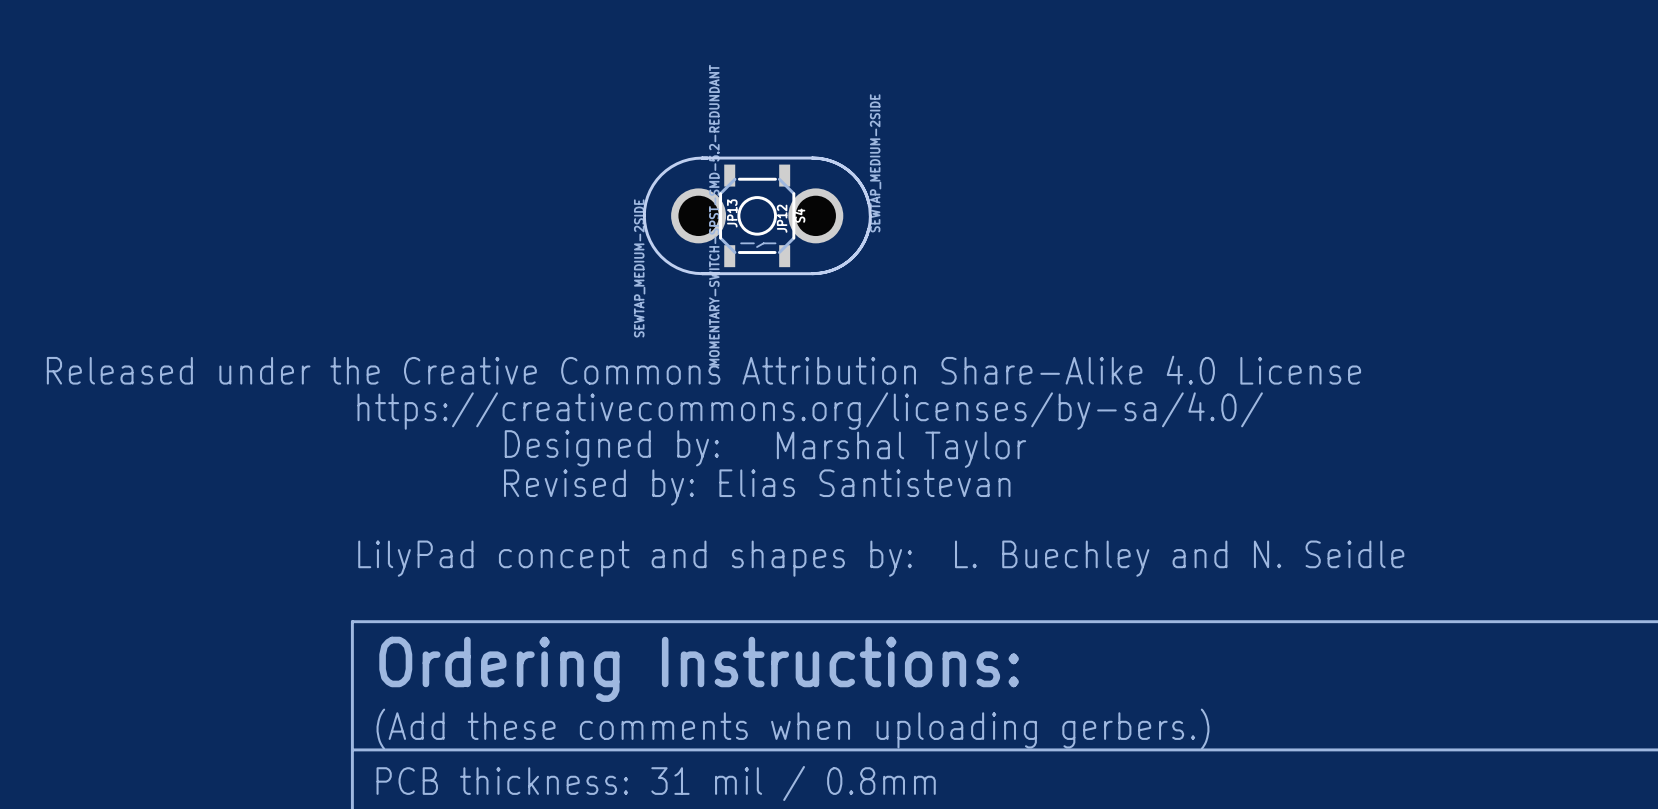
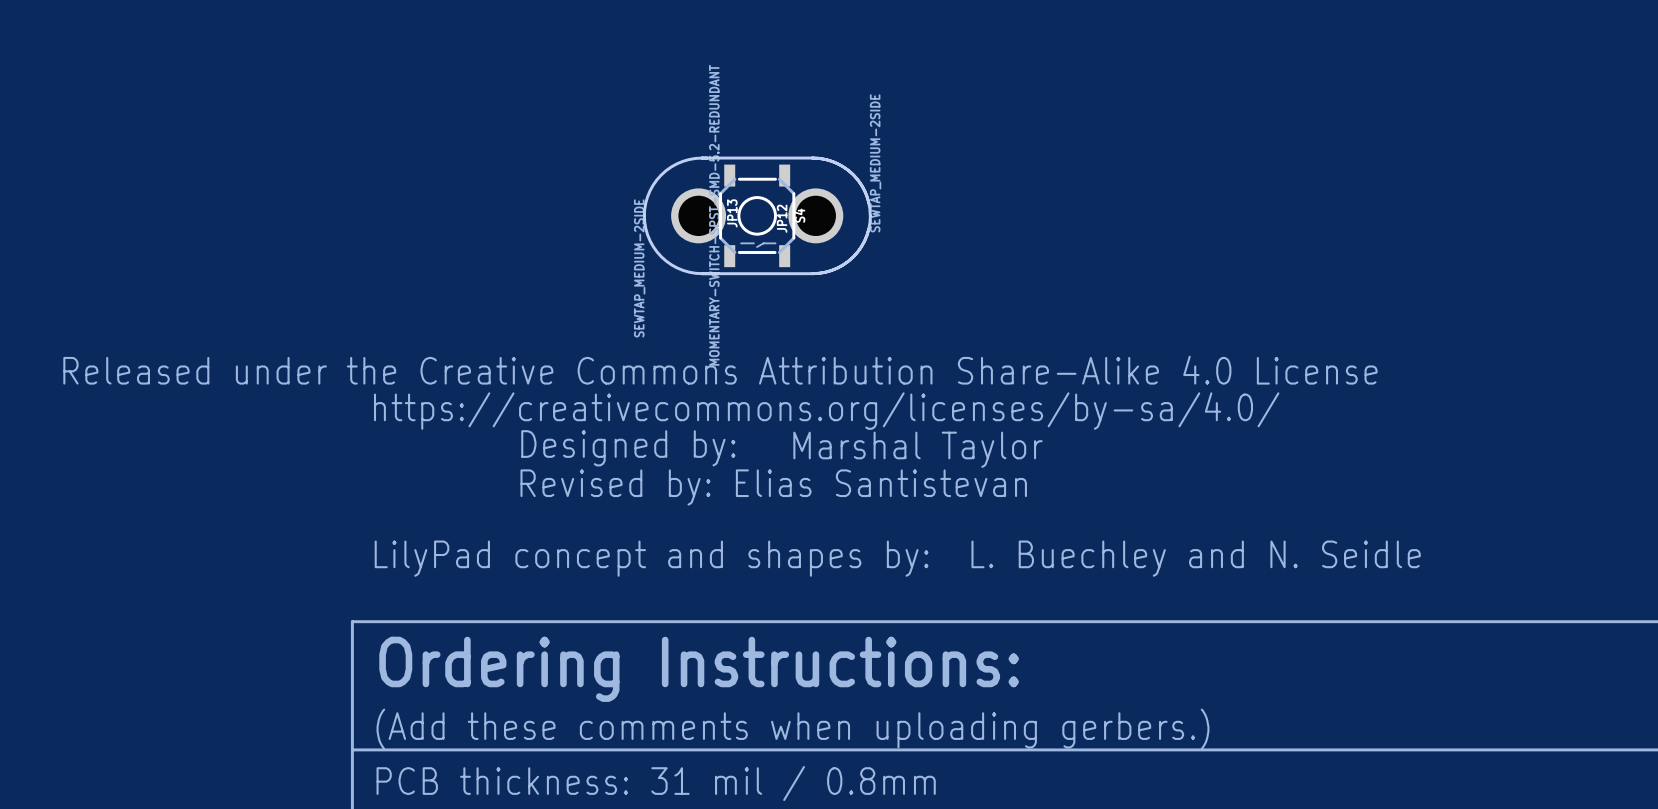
drawing position: (703, 411) -> (720, 411)
text position: Marshal Taylor (901, 449) -> Marshal Taylor (918, 449)
text position: Revised by: Elias Santistevan (757, 487) -> Revised by: Elias Santistevan (773, 487)
text position: LilyPad concept and shapes by: L. Buechley and N. Seidle (881, 558) -> LilyPad concept and shapes by: L. Buechley and N. Seidle (897, 558)

